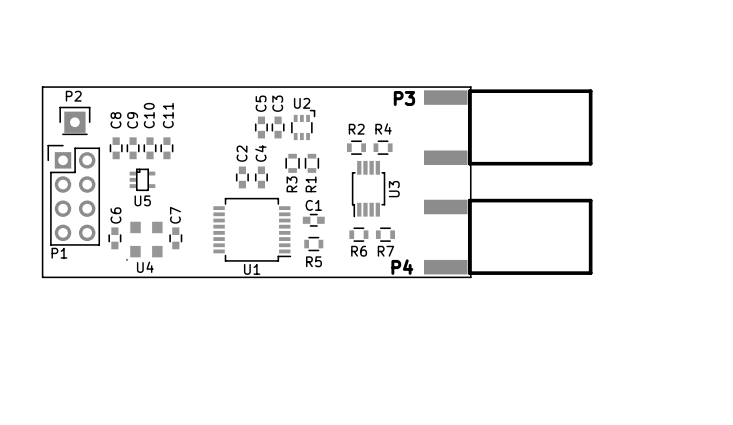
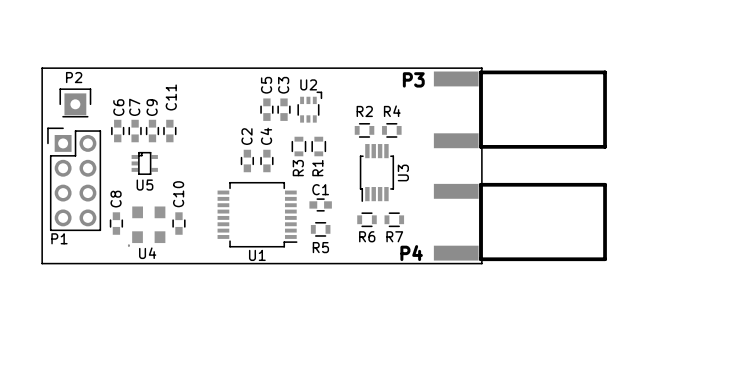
C10 name: C10 (149, 115) -> C9 (152, 107)
C8 name: C8 (115, 120) -> C6 (118, 107)
C9 name: C9 (132, 120) -> C7 (134, 107)
C6 name: C6 (115, 215) -> C8 (116, 199)
C7 name: C7 (175, 215) -> C10 (178, 194)

